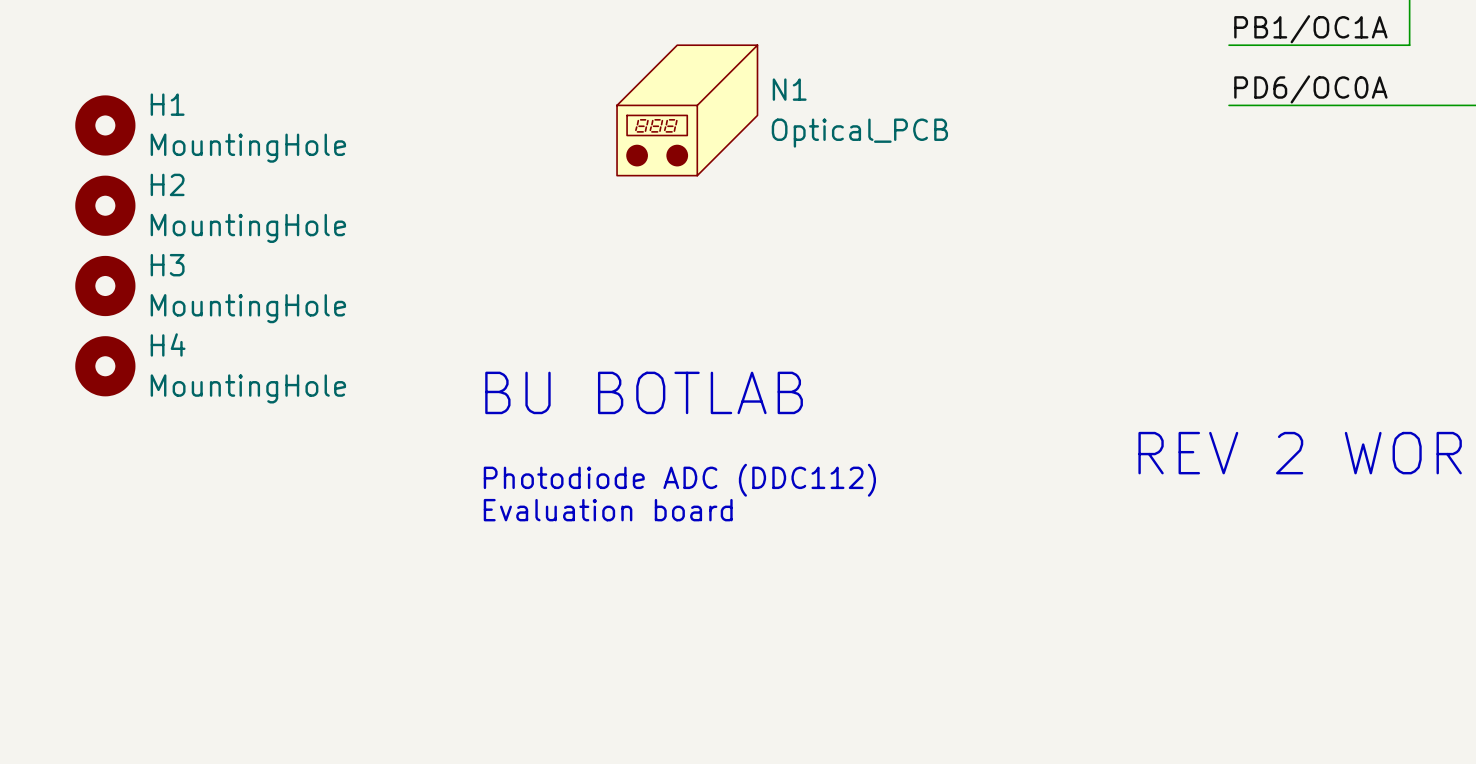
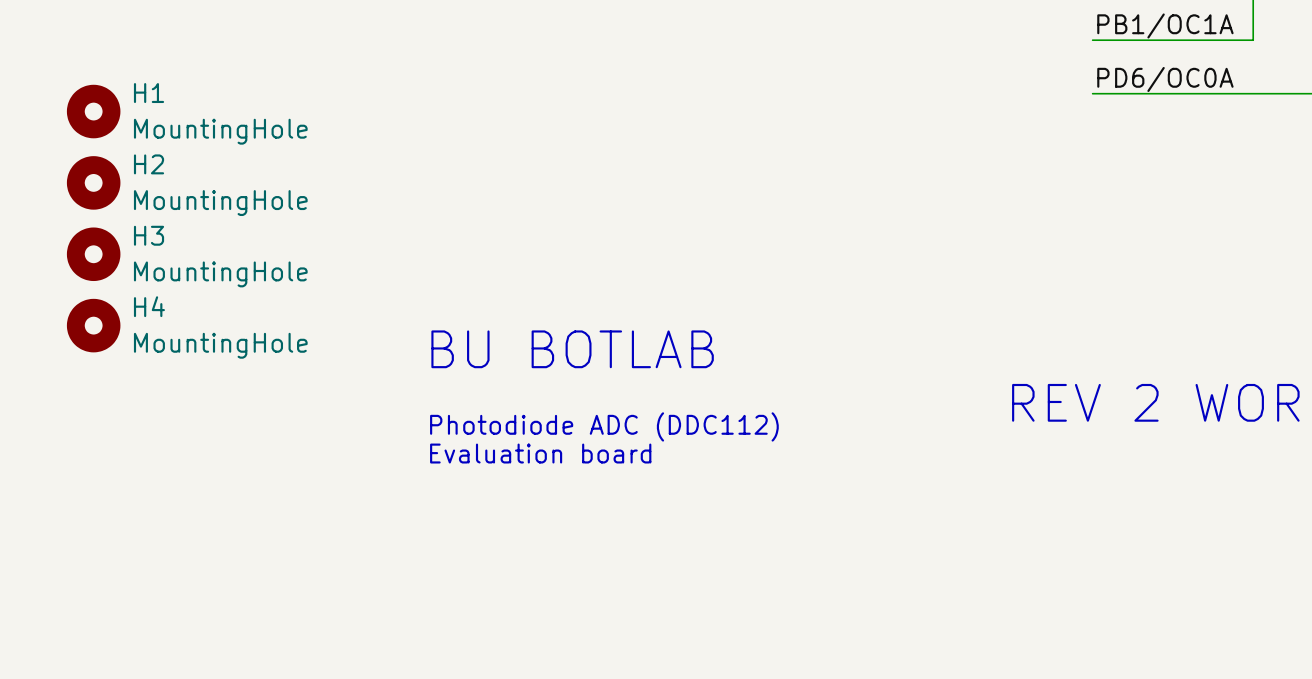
N1: Optical_PCB (687, 110) -> none

